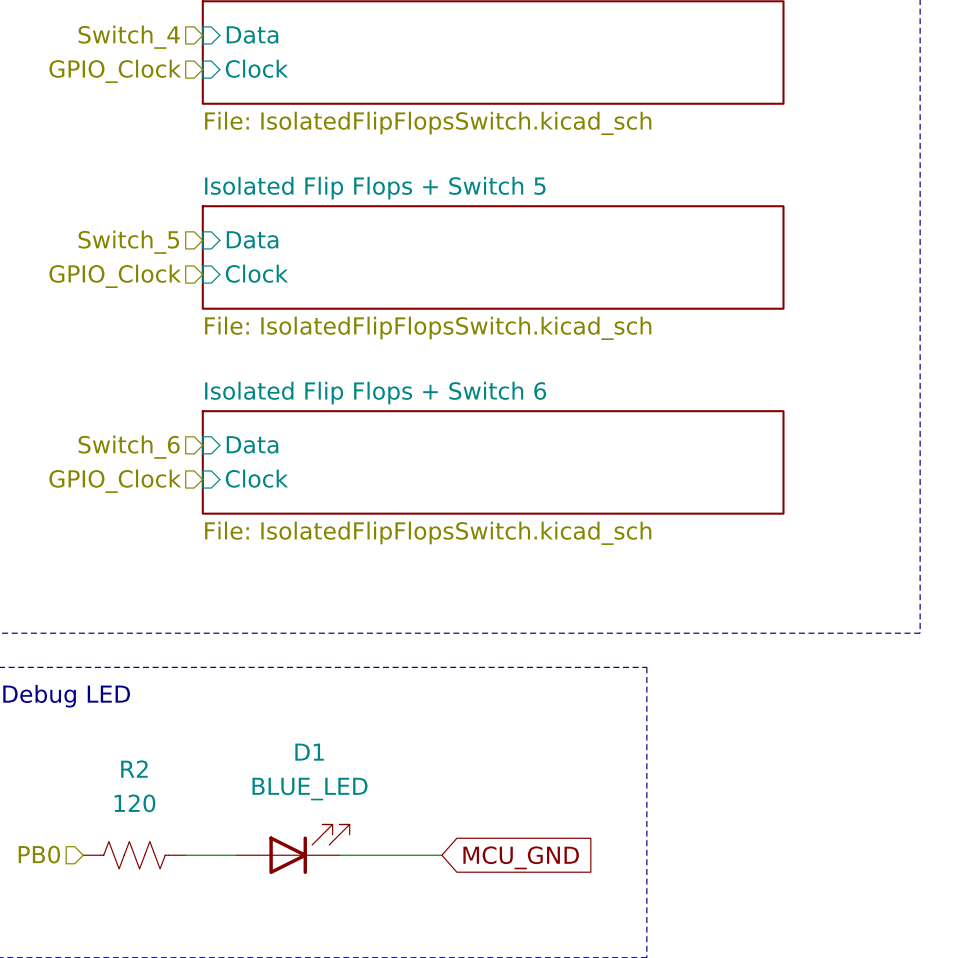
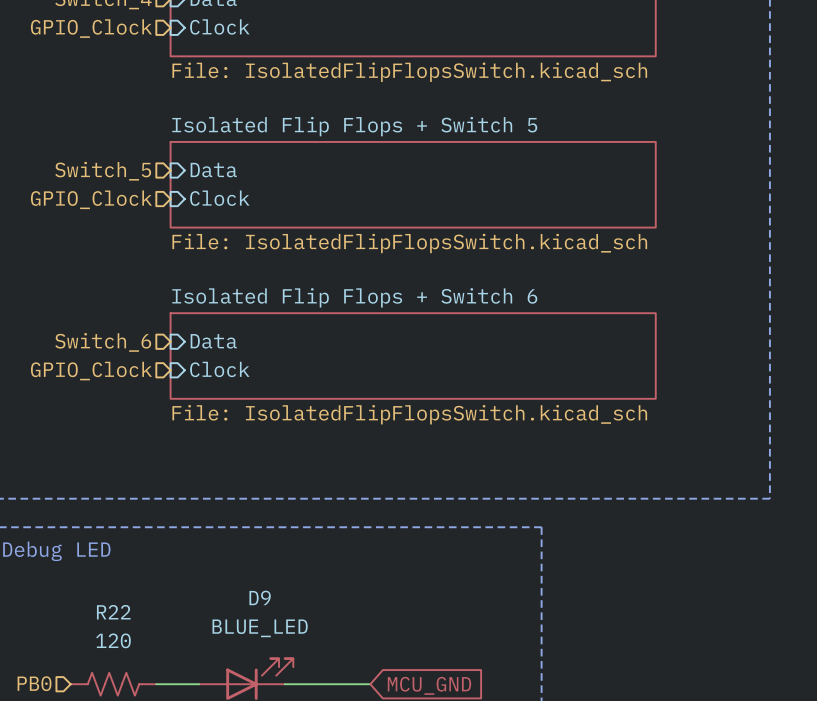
D1 name: D1 (309, 752) -> D9 (260, 597)
R2 name: R2 (134, 769) -> R22 (113, 612)

